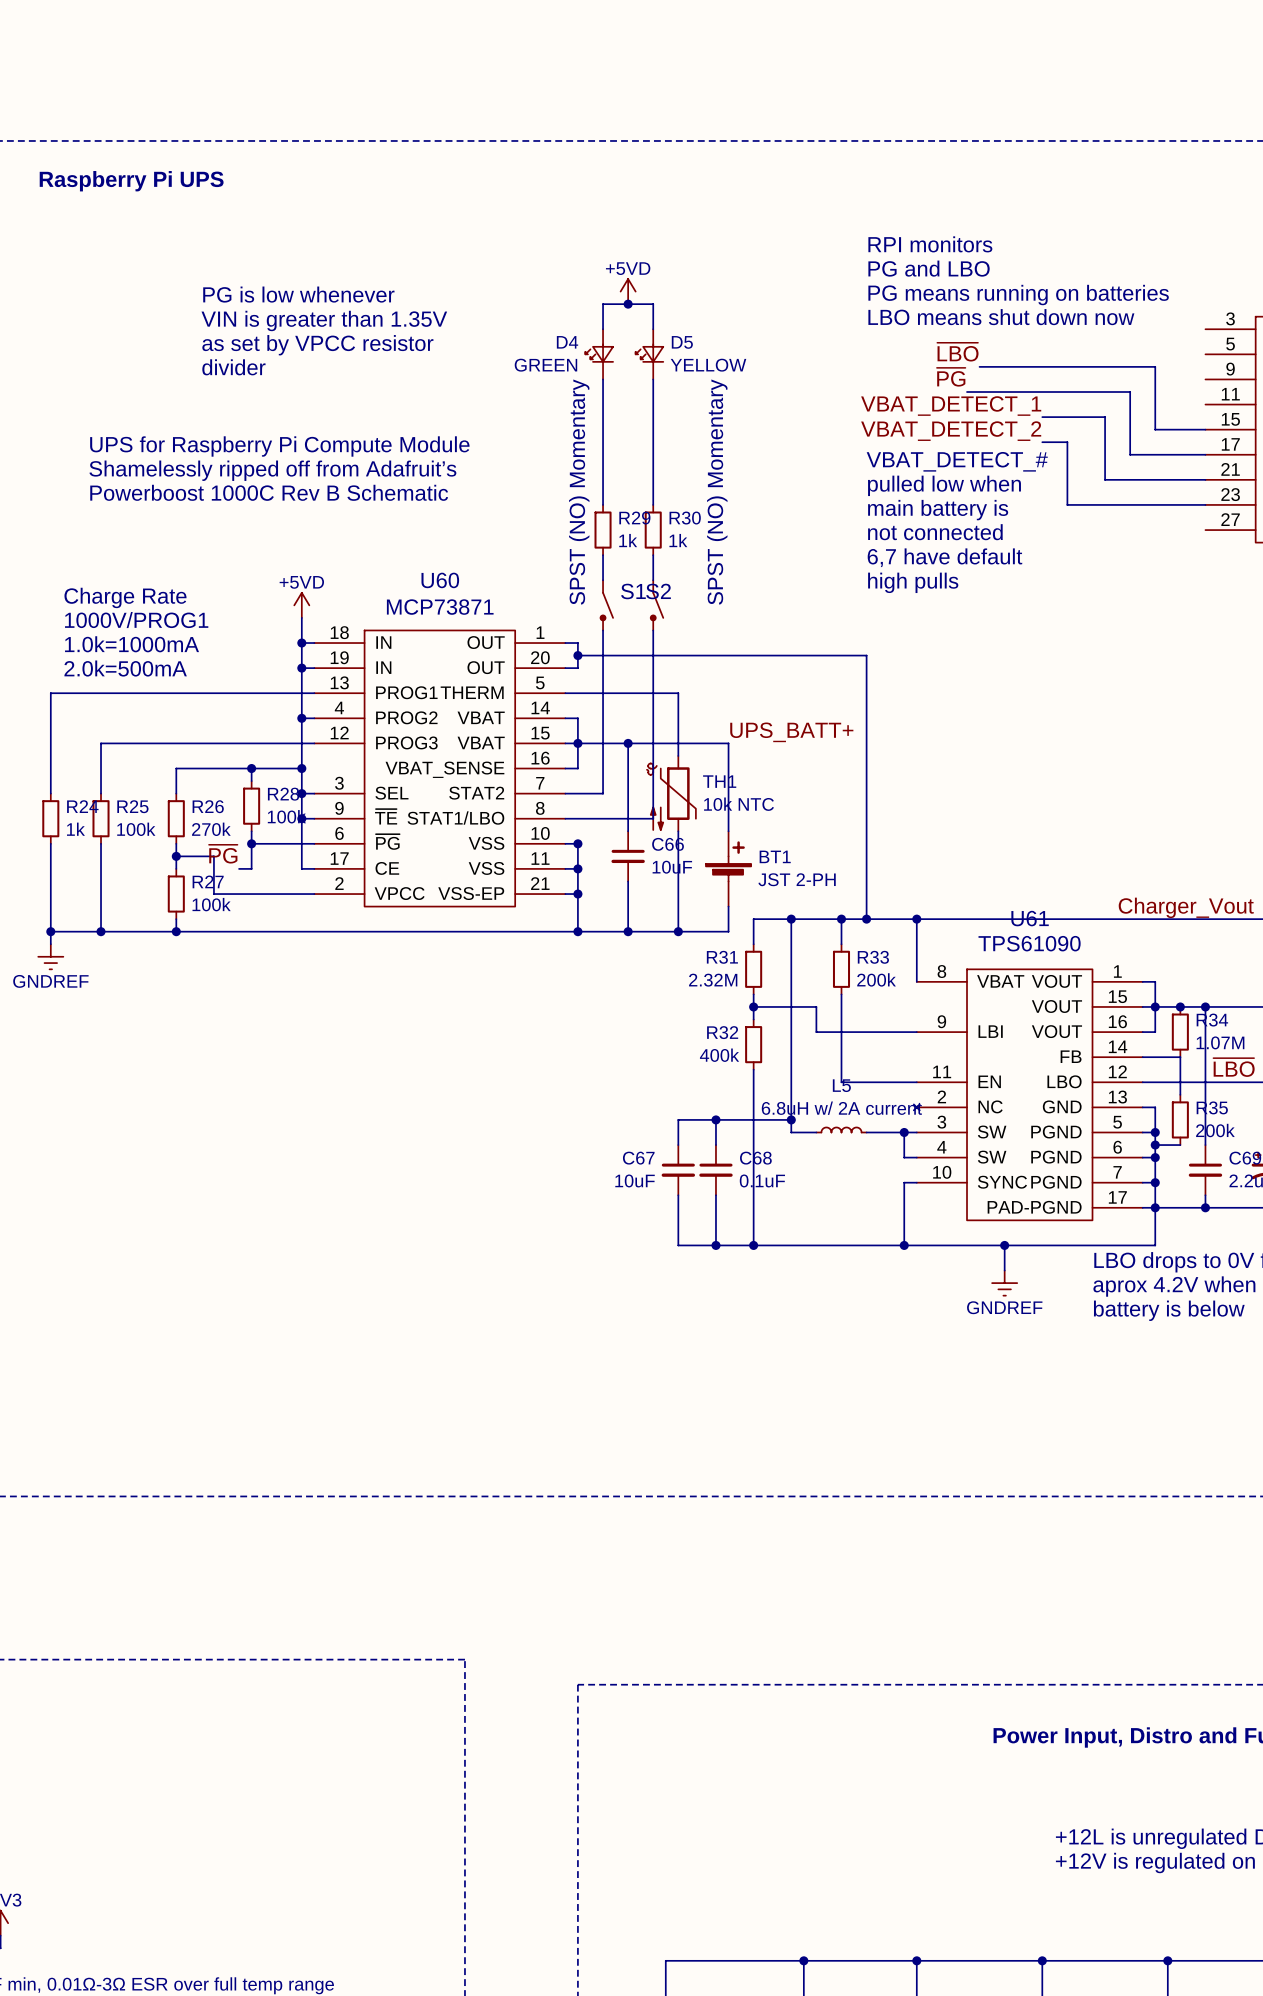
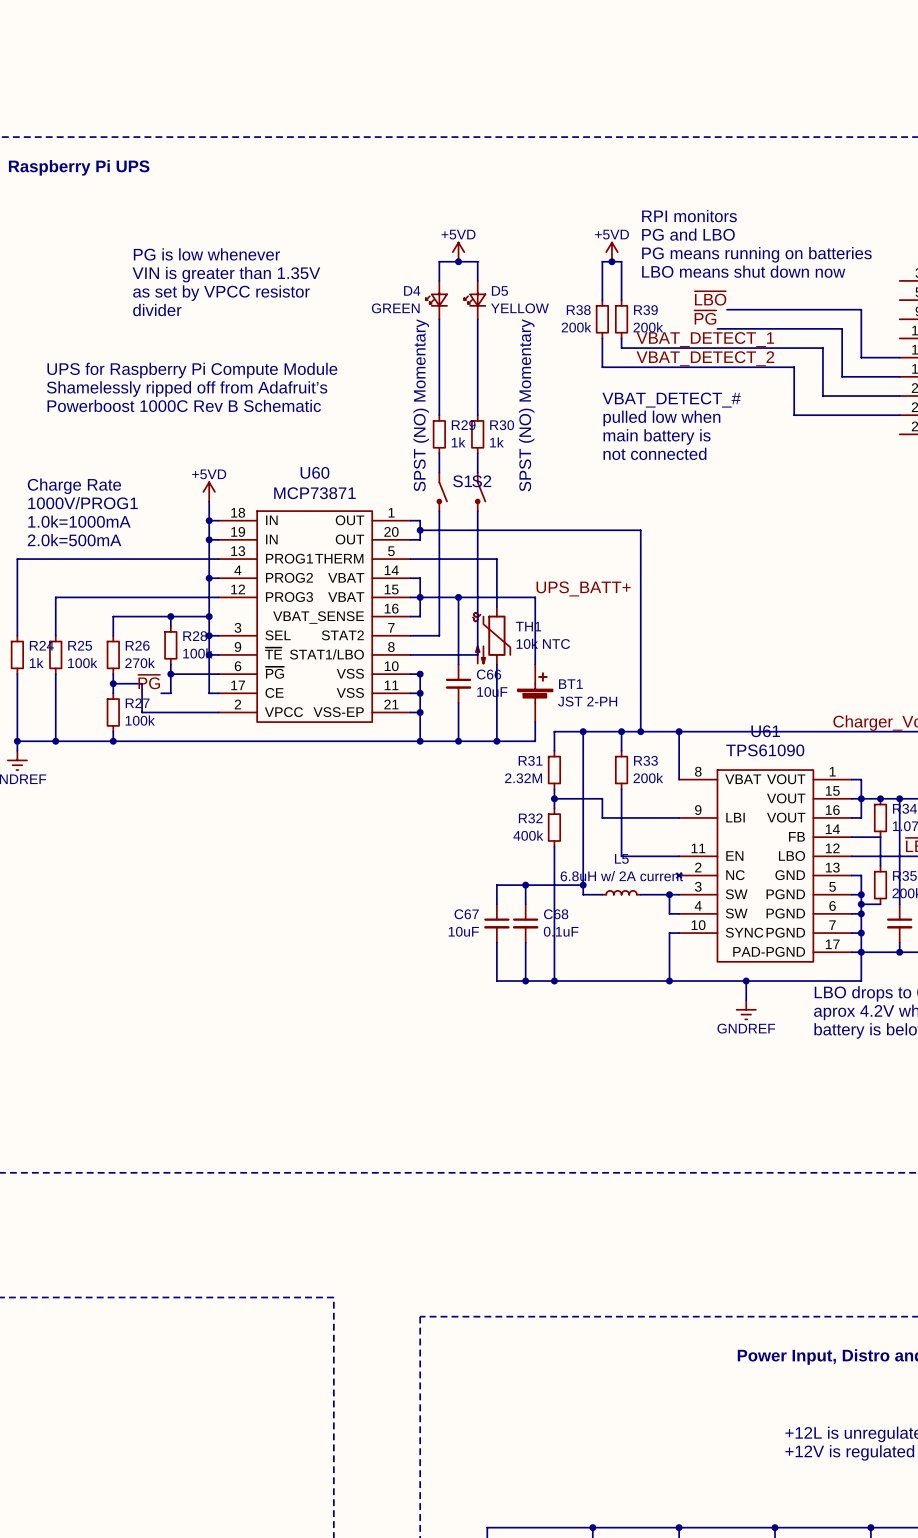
power symbol: none -> +5VD (611, 252)
junction: none -> (611, 261)
wire: none -> (602, 300) (602, 261) (621, 261) (621, 300)
R38: none -> 200k (602, 319)
R39: none -> 200k (621, 319)
wire: none -> (602, 338) (602, 367) (775, 367)
wire: none -> (621, 338) (621, 348) (775, 348)
text position: VBAT_DETECT_# (957, 461) -> VBAT_DETECT_# (671, 400)
text position: pulled low when (944, 485) -> pulled low when (661, 418)
text position: main battery is (938, 510) -> main battery is (657, 436)
text position: not connected (935, 532) -> not connected (654, 453)
text: 6,7 have default (944, 557) -> none
text: high pulls (913, 582) -> none

